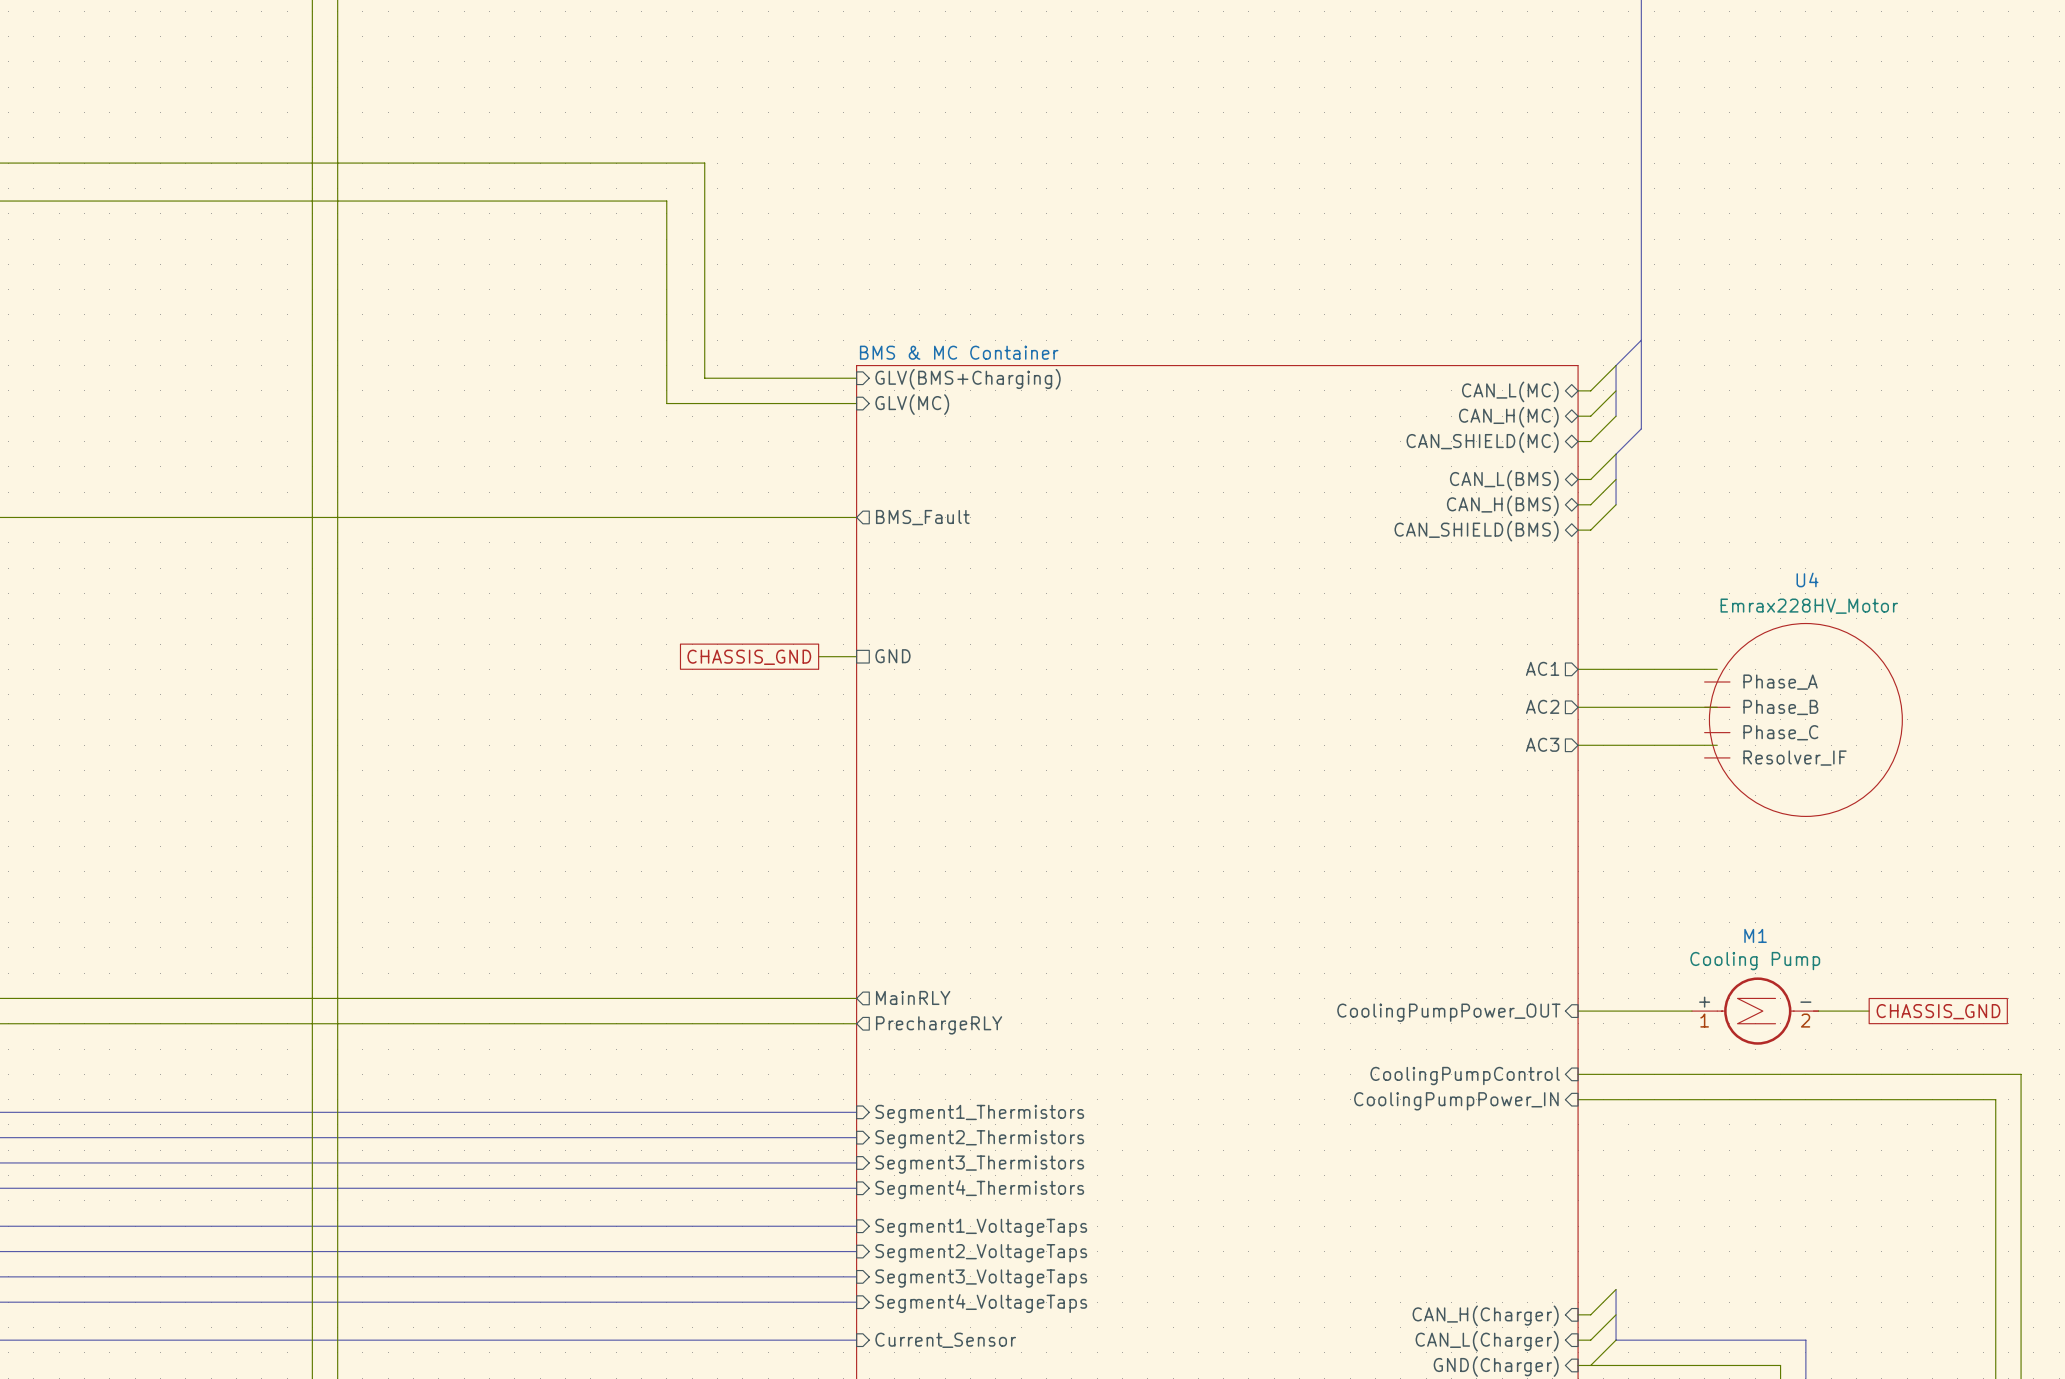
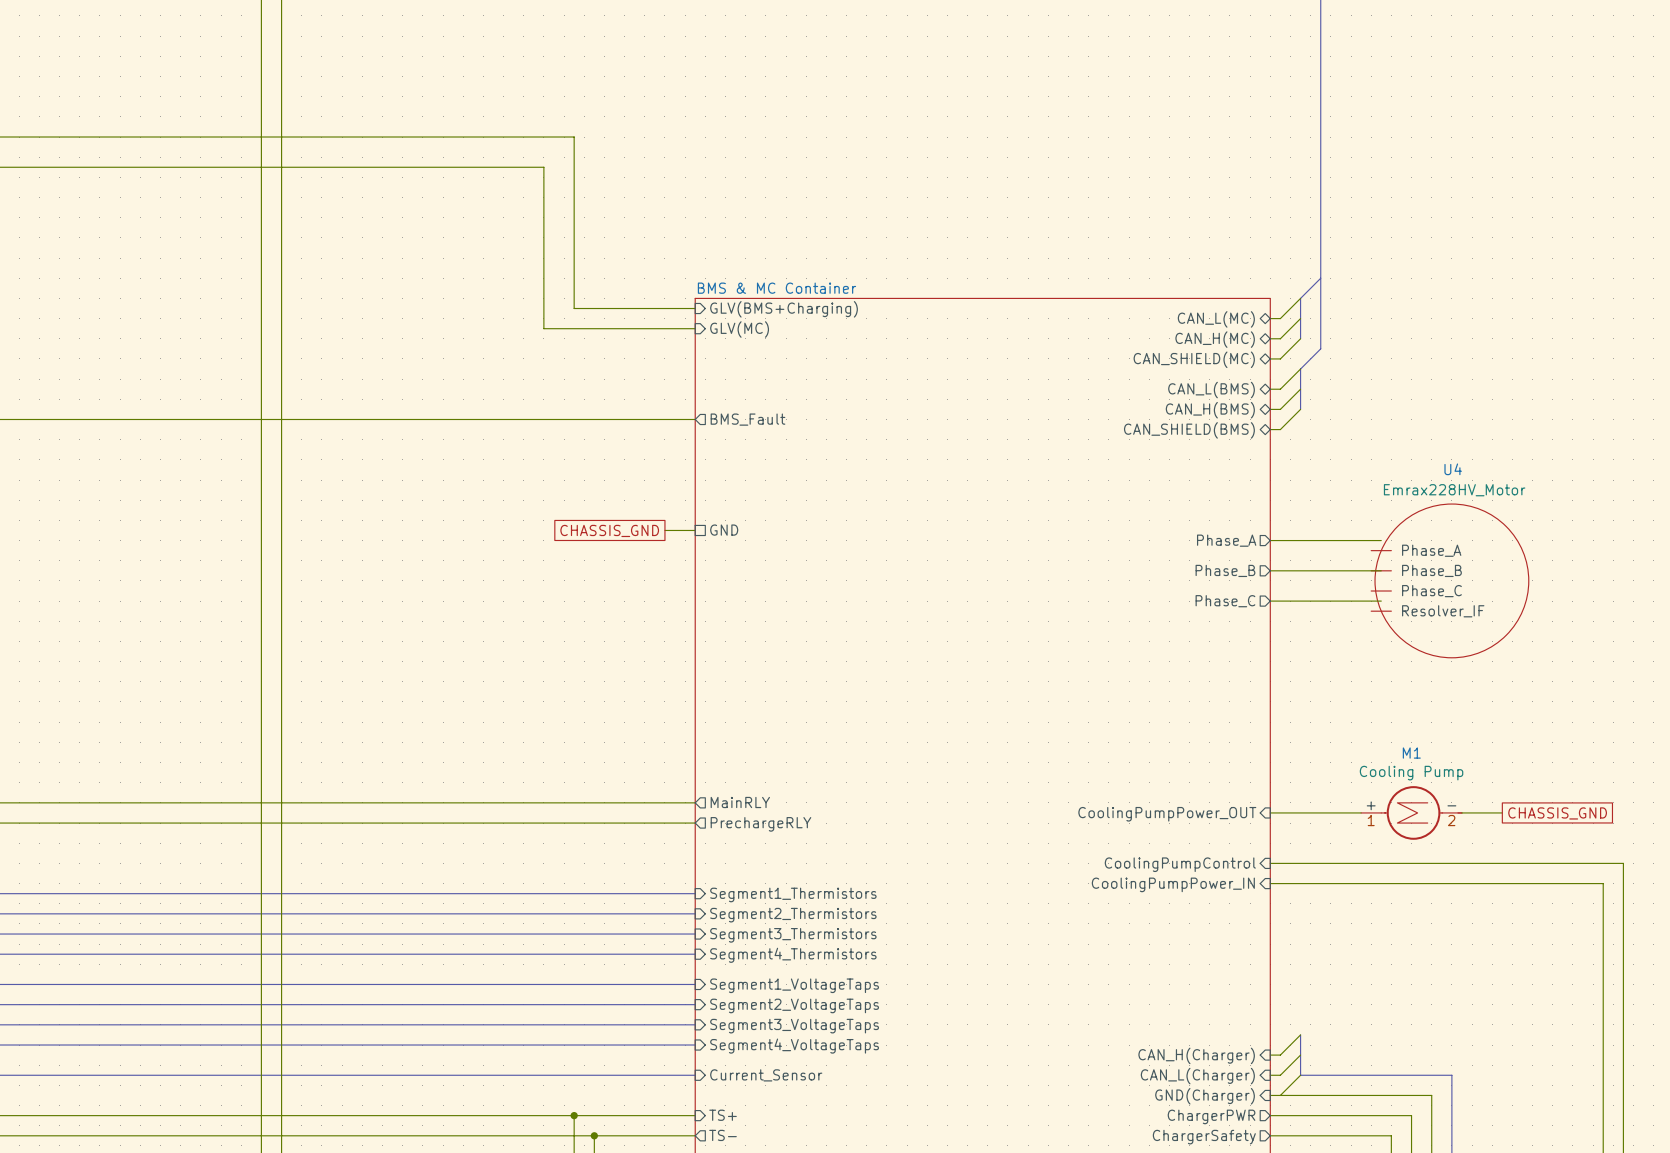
sheet pin: AC1 (1542, 668) -> Phase_A (1226, 540)
sheet pin: AC2 (1542, 706) -> Phase_B (1225, 570)
sheet pin: AC3 (1542, 744) -> Phase_C (1225, 601)

